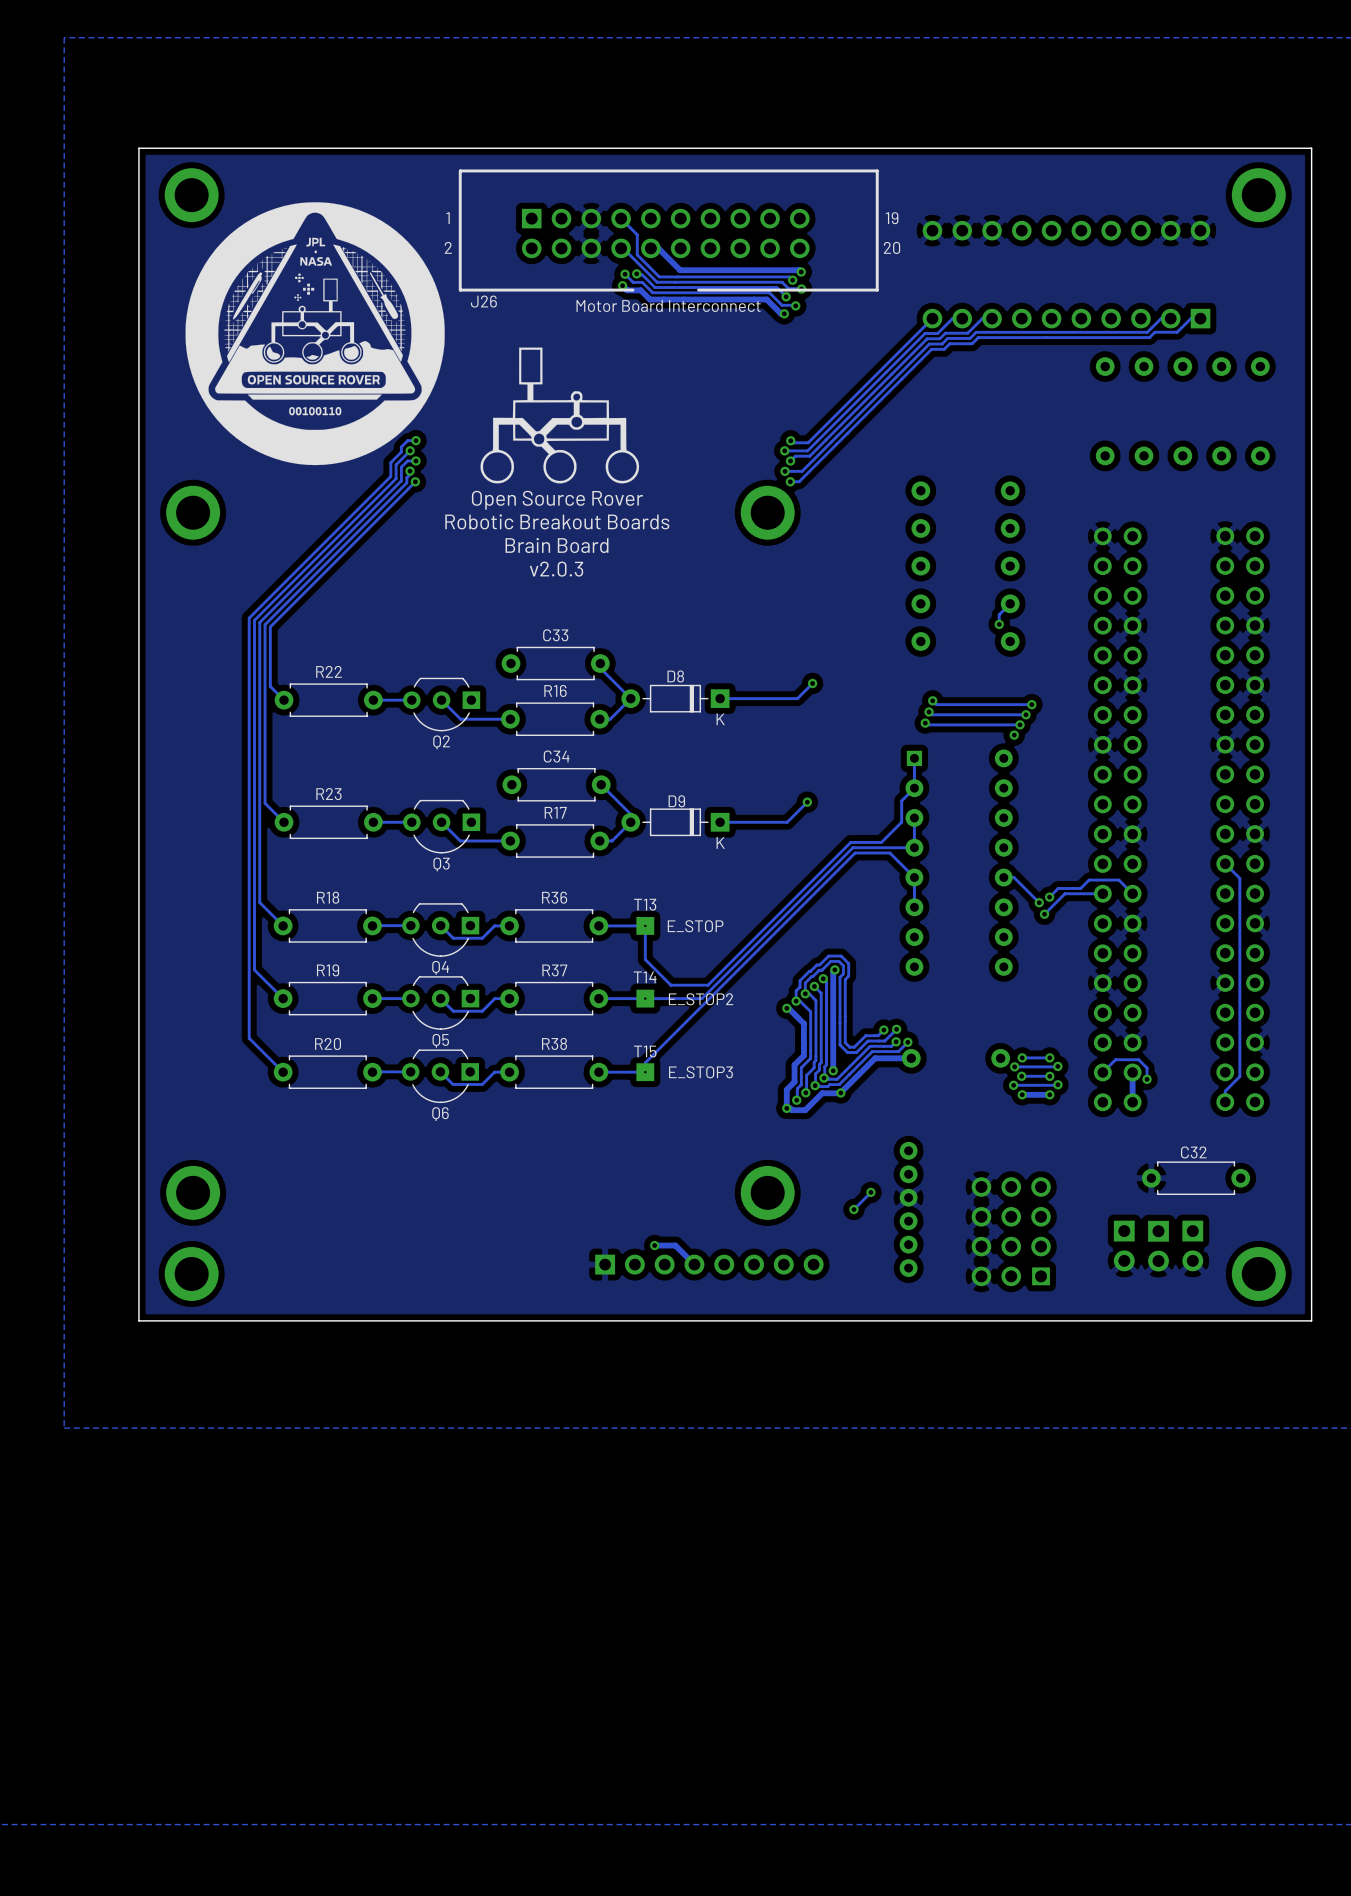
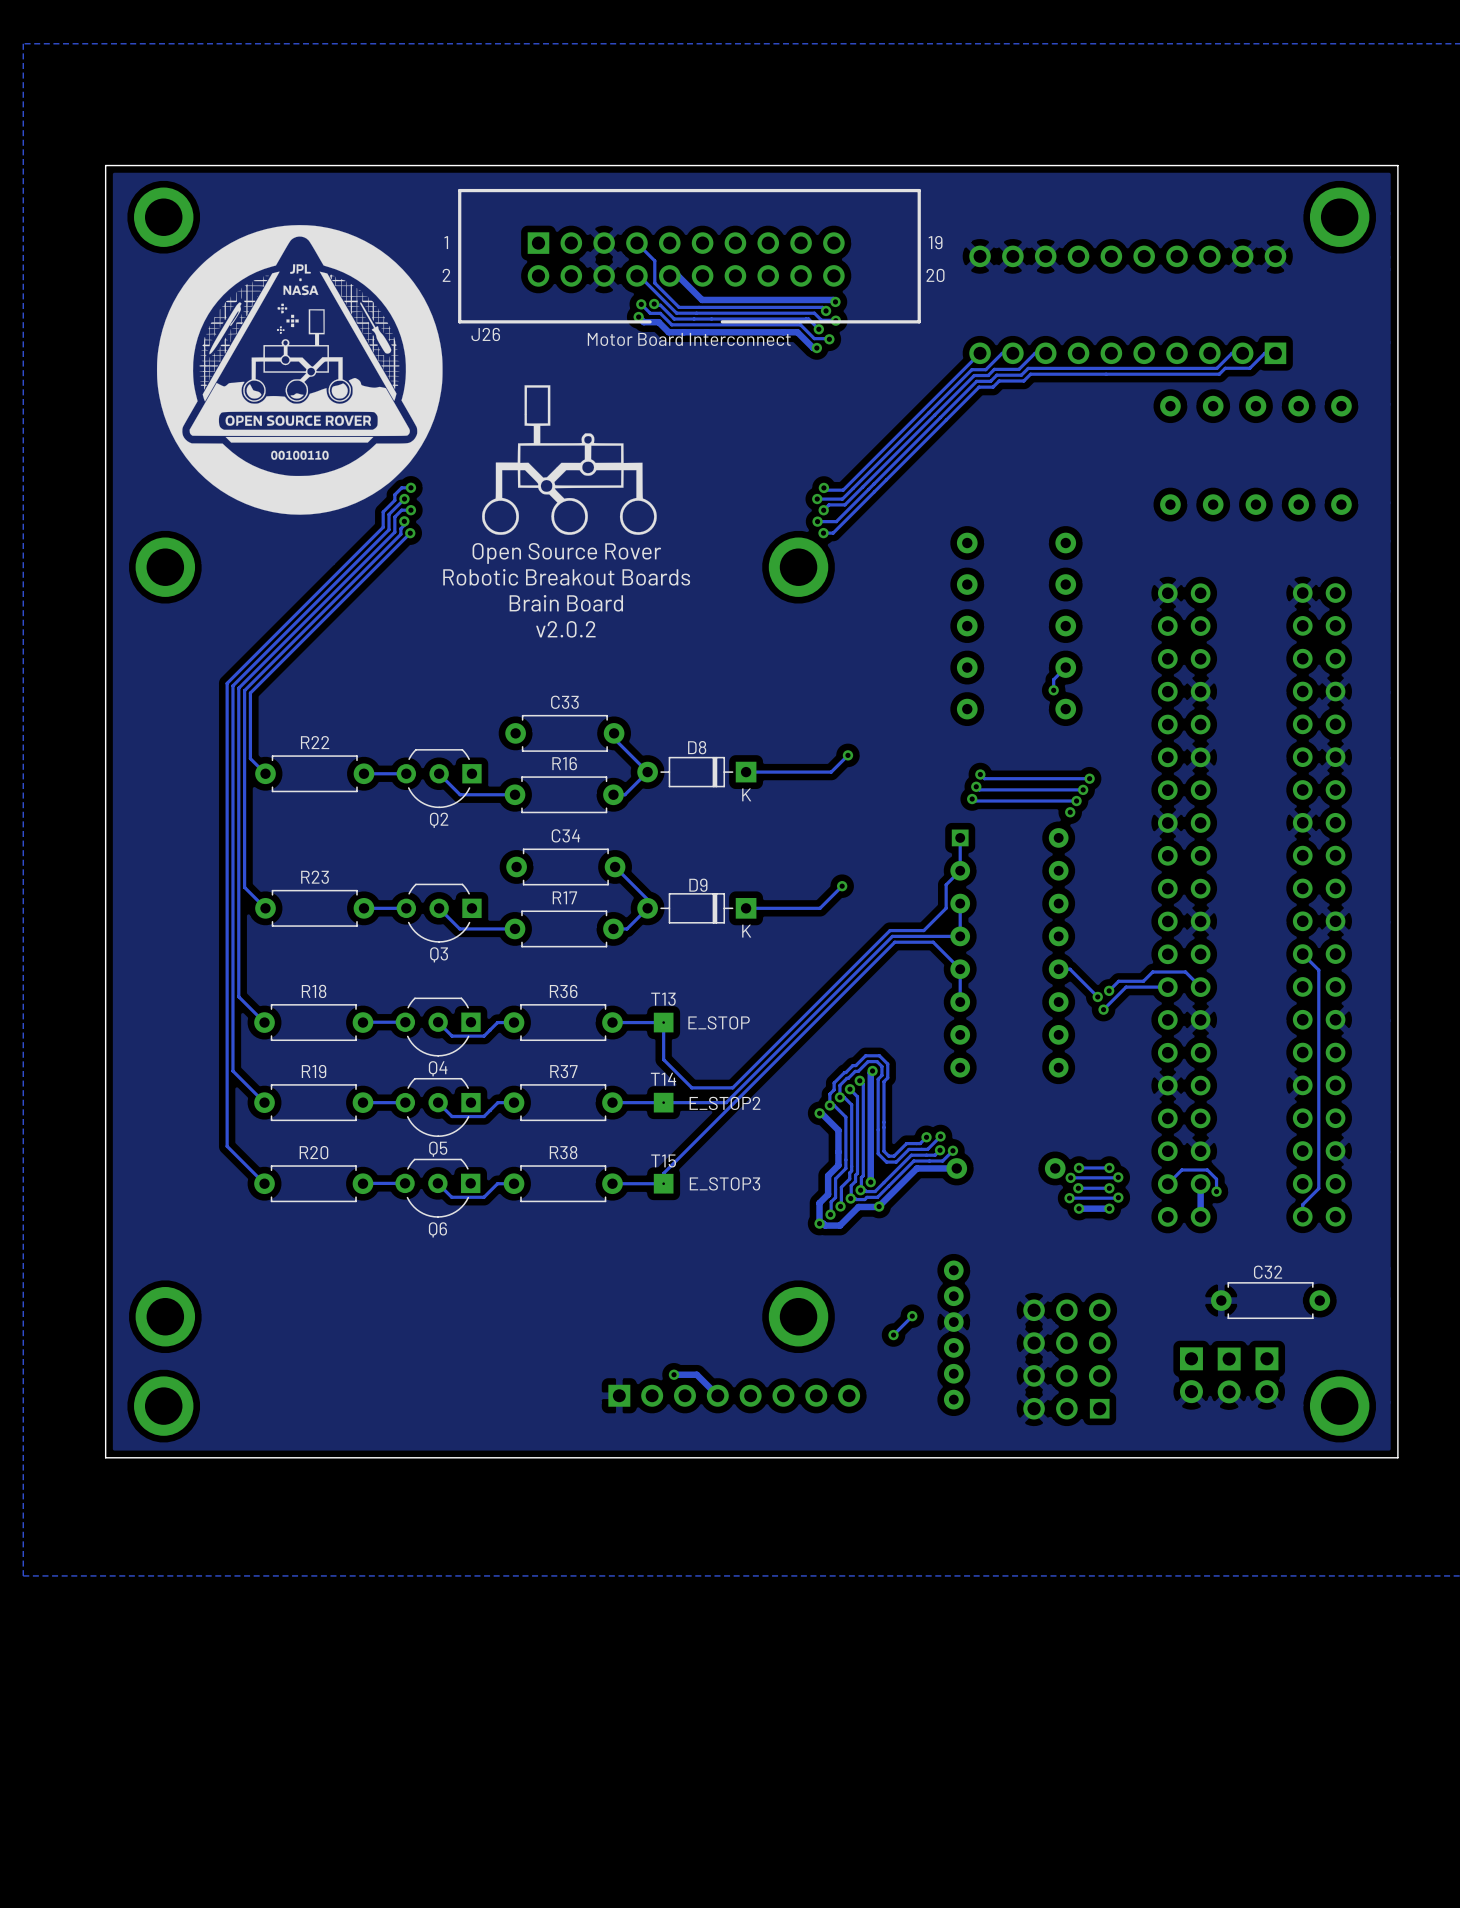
text: v2.0.3 (556, 569) -> v2.0.2 (565, 629)

